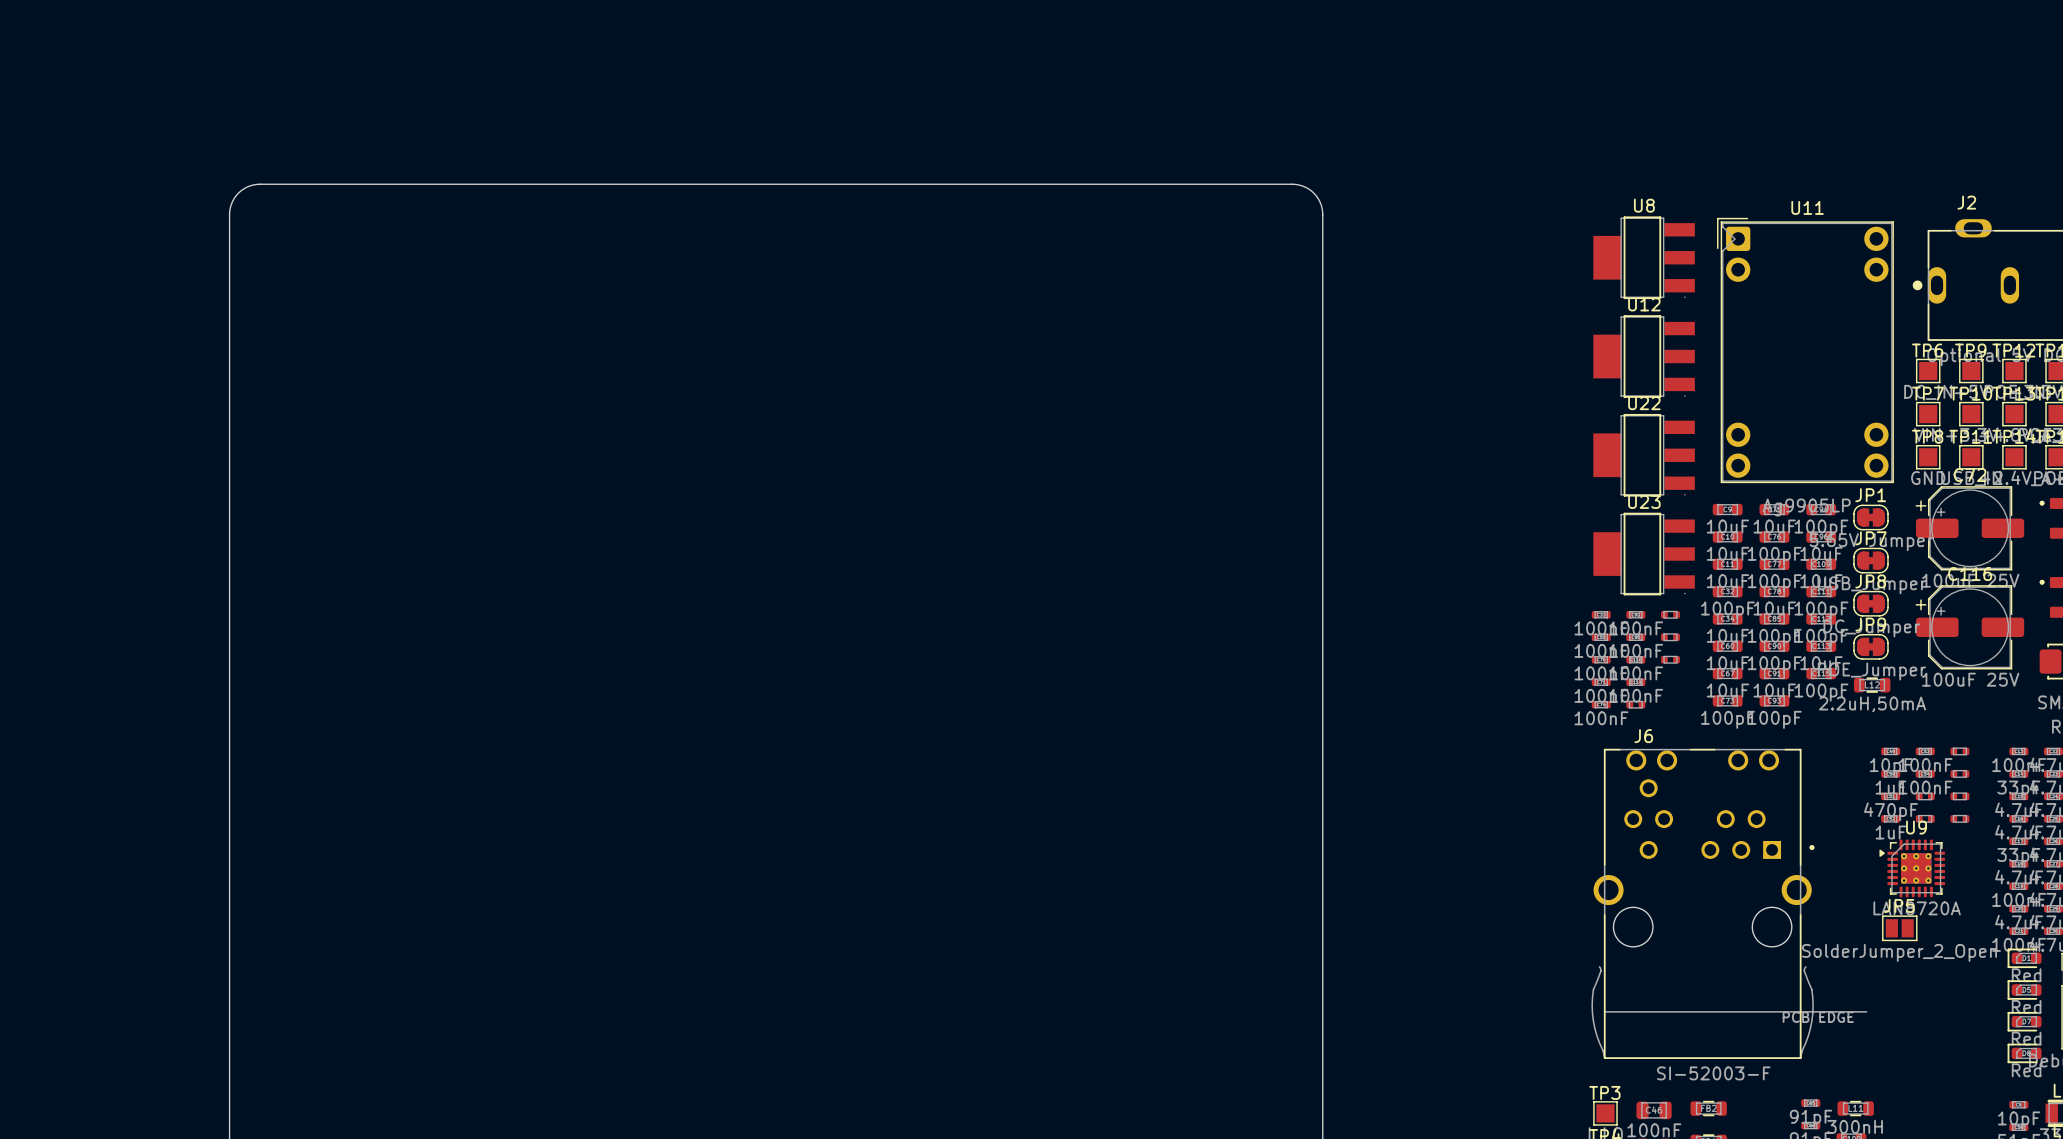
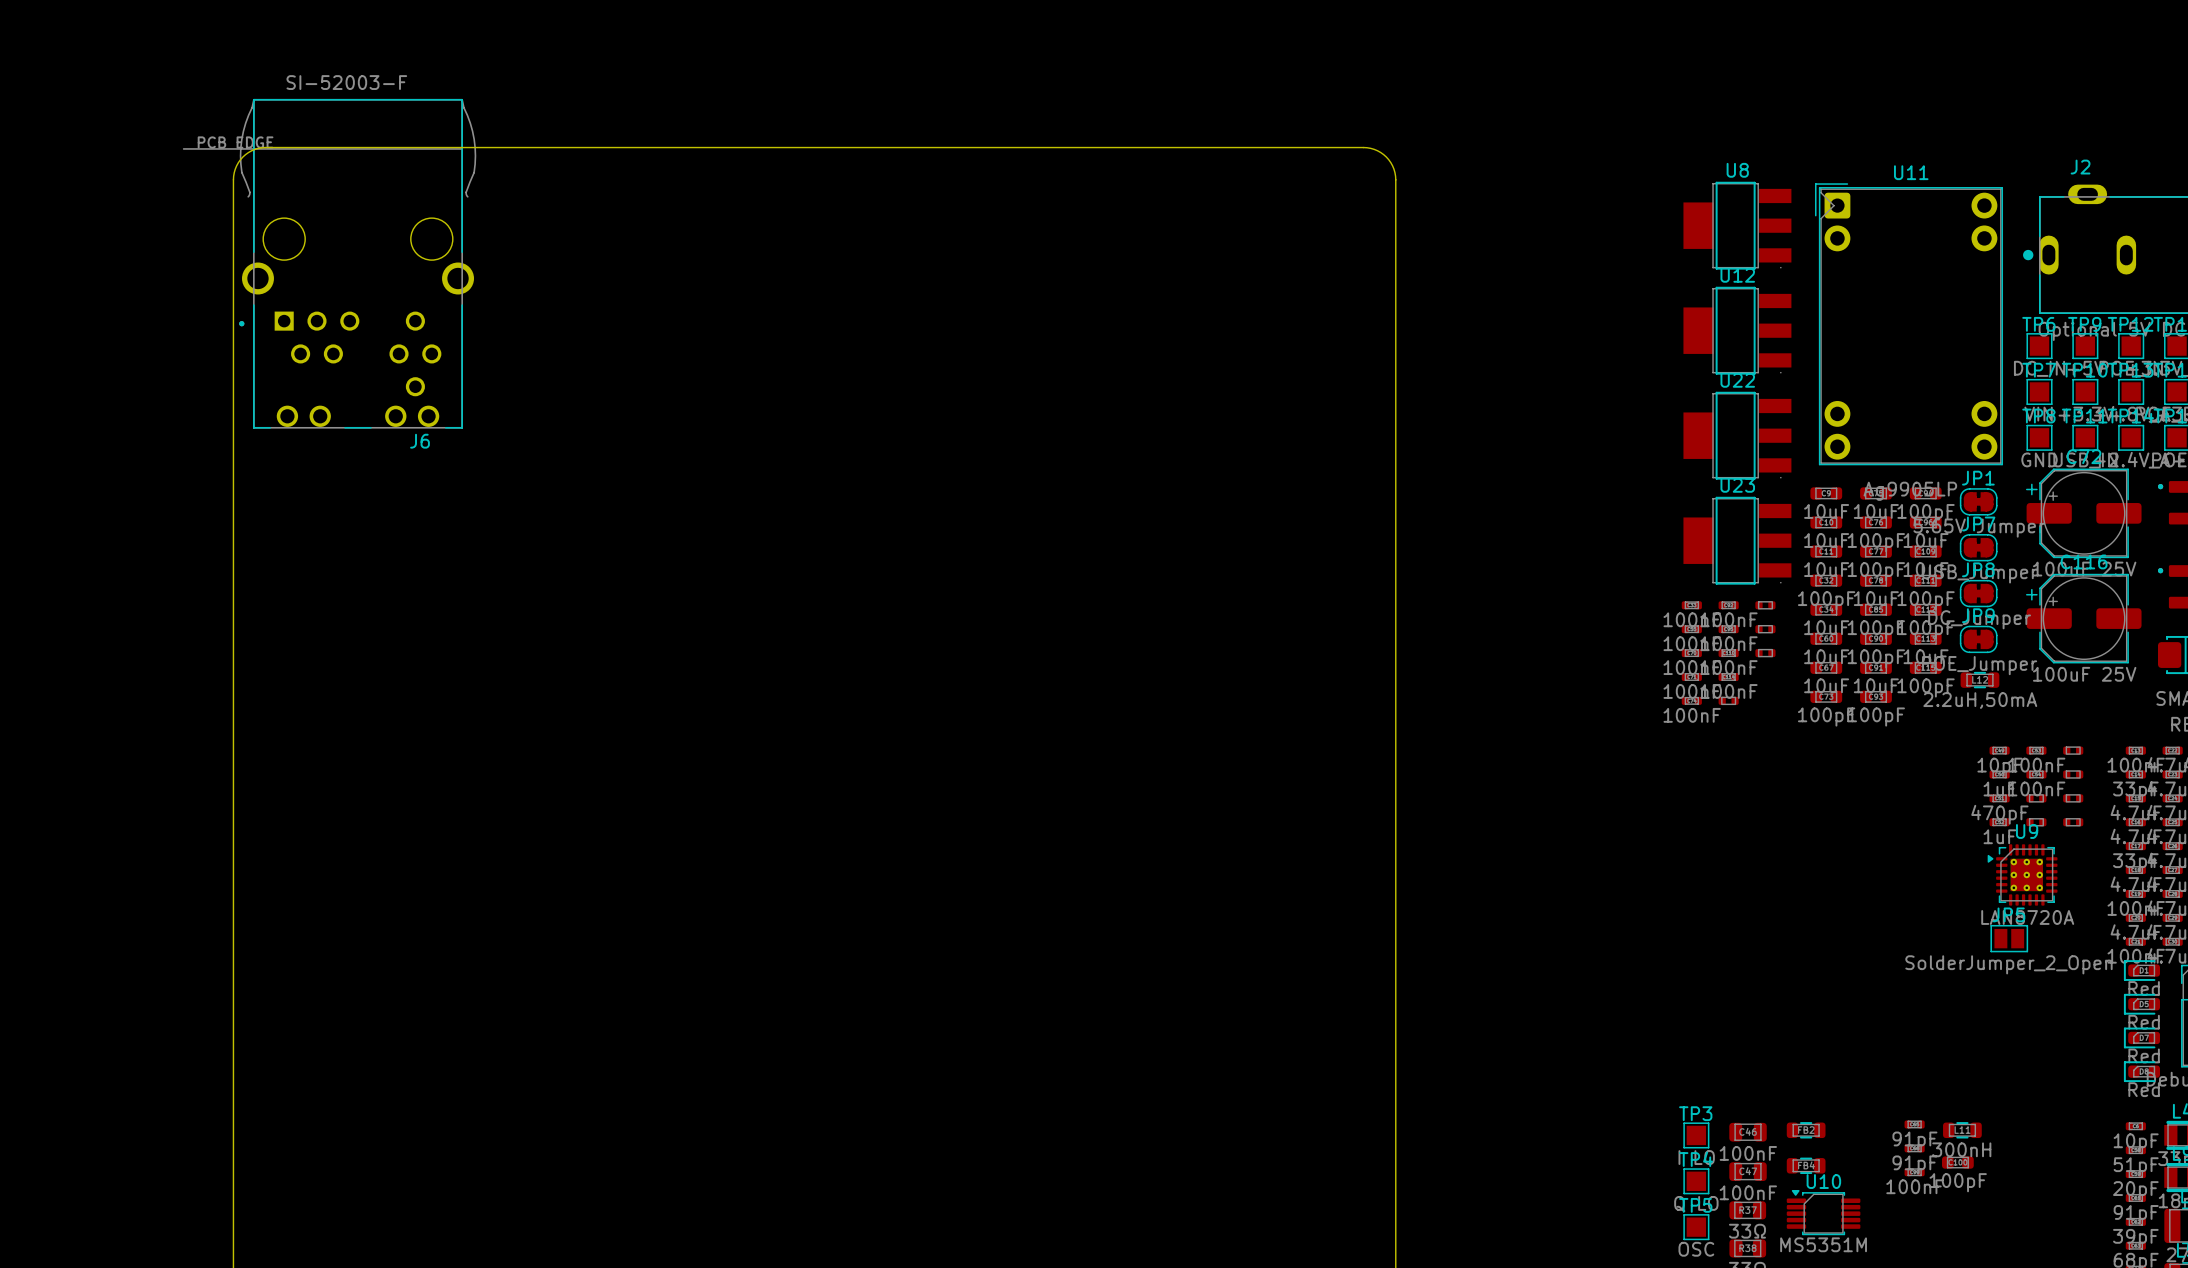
J6 rotation: 0° (1729, 903) -> 180° (329, 263)
J6 position: (1729, 903) -> (329, 263)

